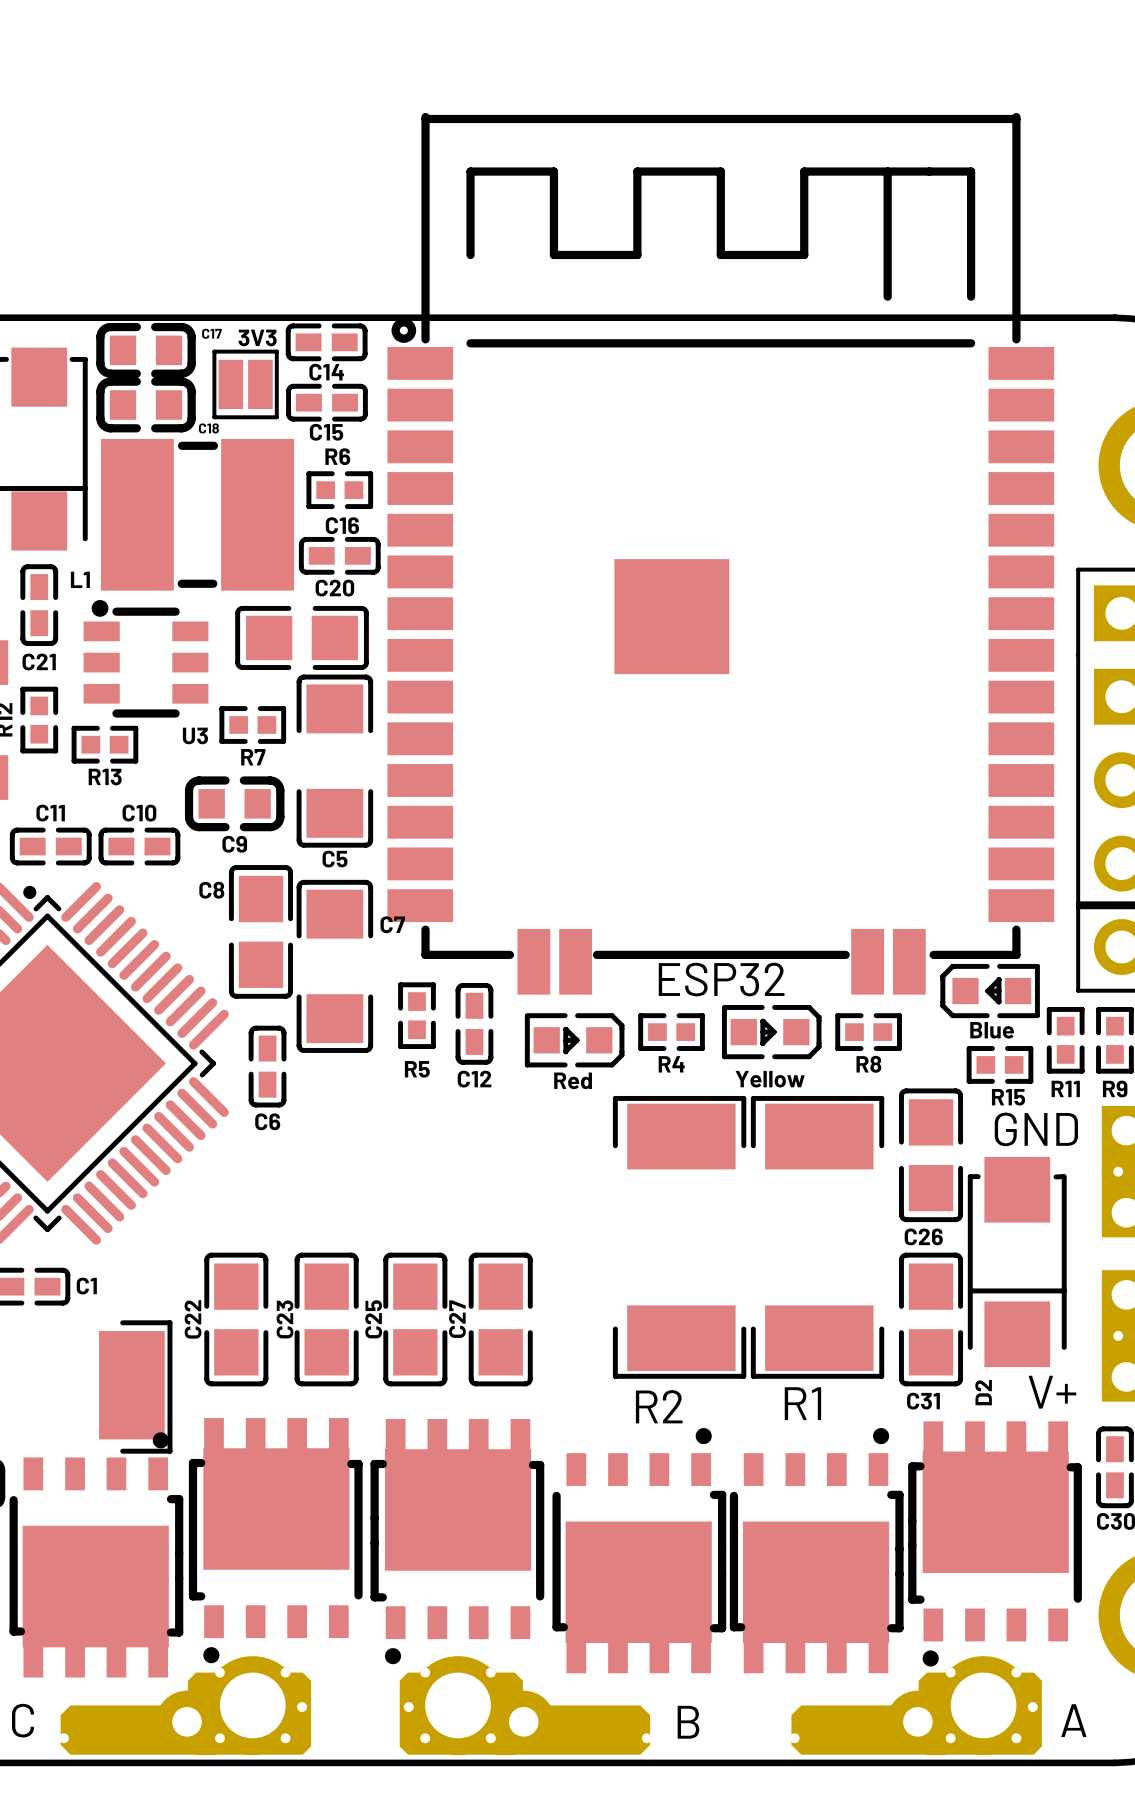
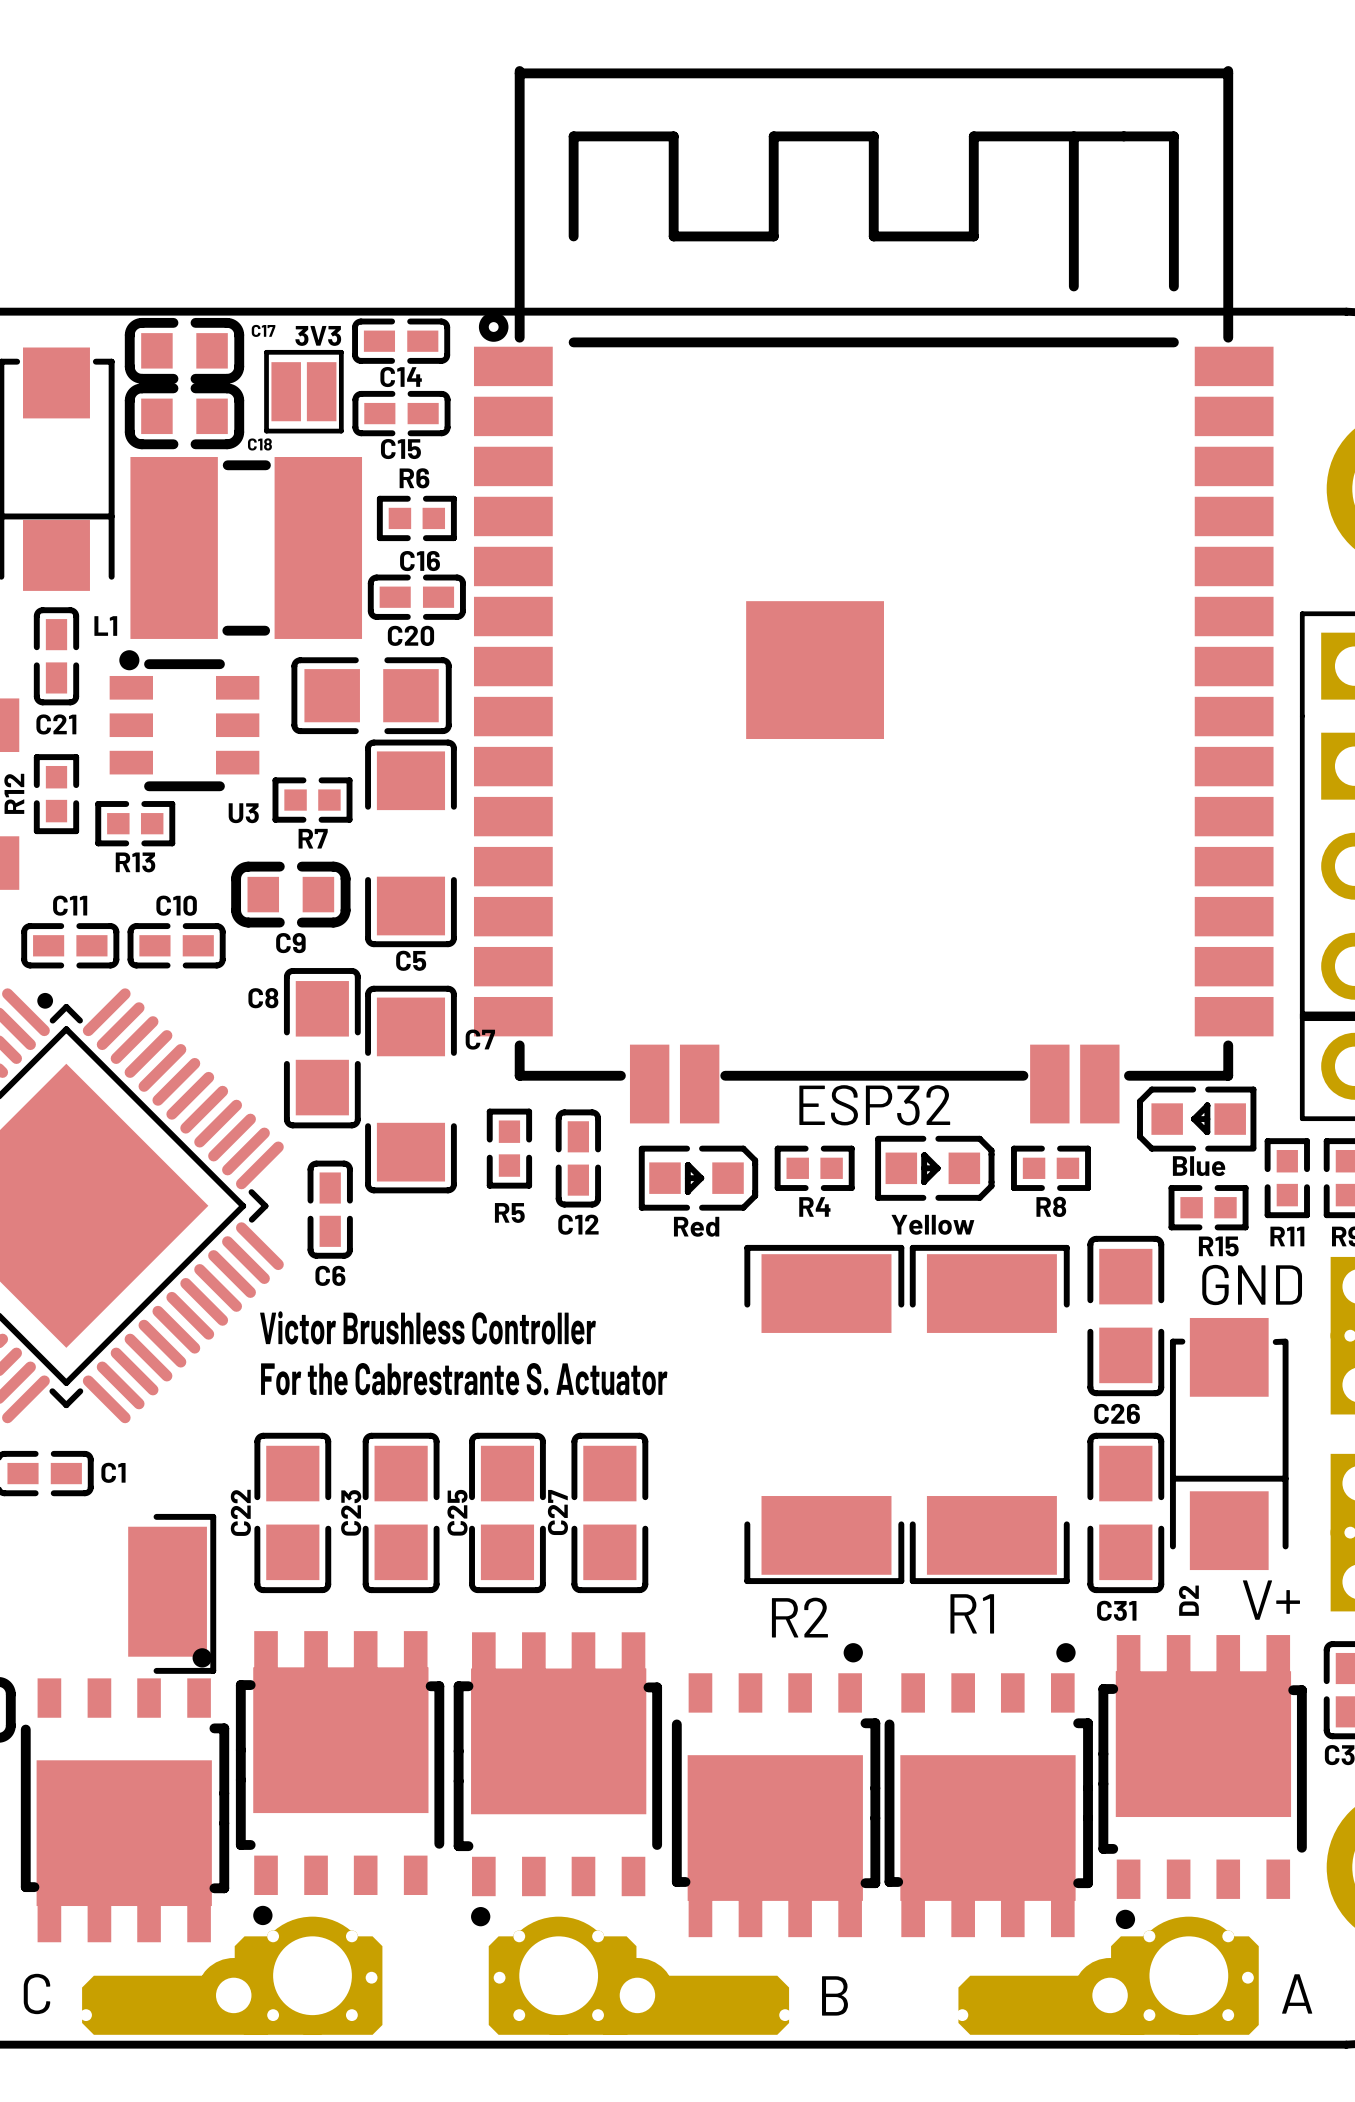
text: none -> Victor Brushless Controller (428, 1327)
text: none -> For the Cabrestrante S. Actuator (464, 1379)

